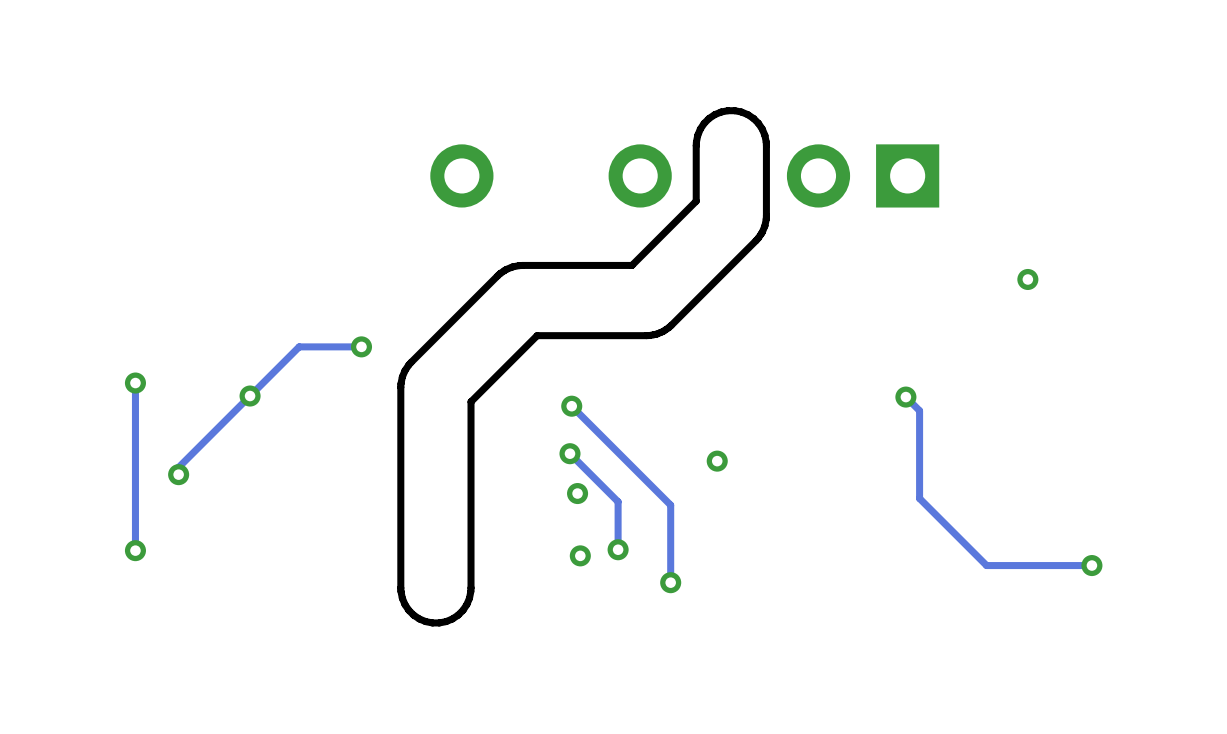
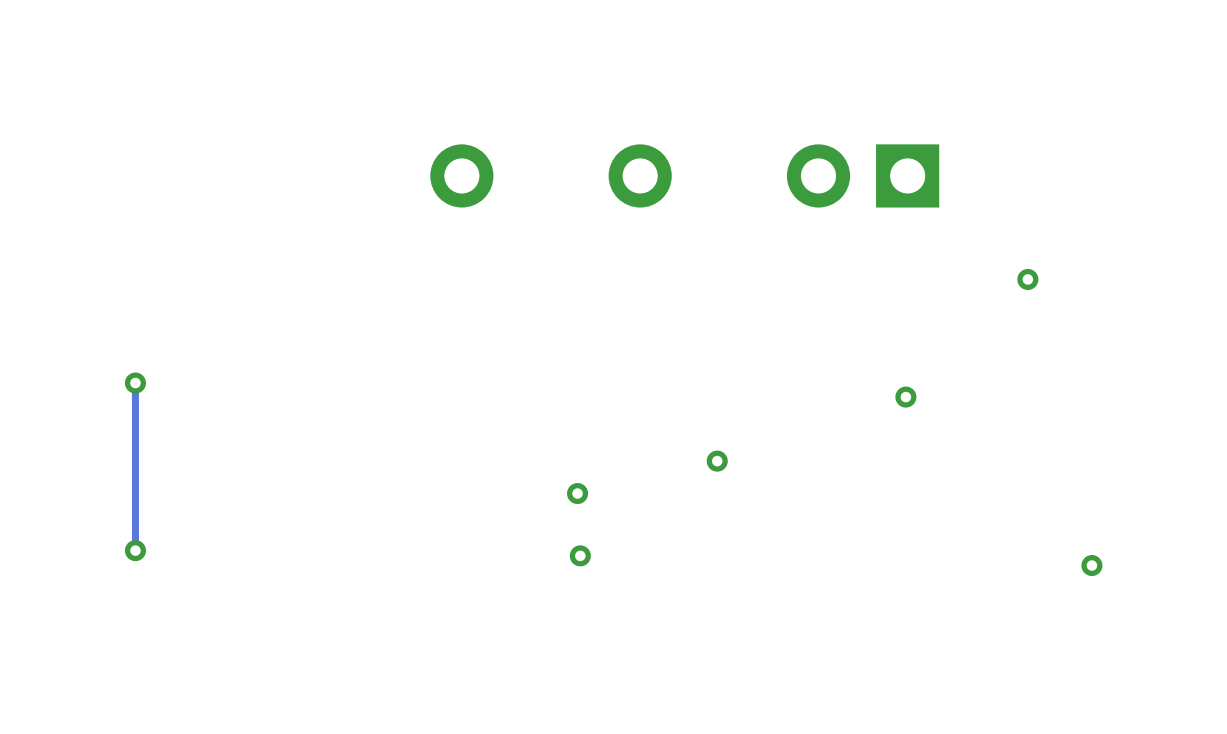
board edge: (734, 110) (753, 118) (764, 135) (766, 215) (762, 232) (671, 325) (663, 331) (646, 335) (537, 335) (471, 401) (469, 598) (458, 615) (446, 621) (432, 622) (419, 618) (404, 604) (400, 591) (400, 387) (404, 370) (497, 275) (506, 269) (522, 265) (631, 265) (696, 201) (696, 142) (700, 129) (714, 114) (734, 110) -> none
track: (361, 346) (299, 346) (178, 467) (178, 474) -> none
via: (361, 346) -> none
via: (250, 396) -> none
track: (905, 397) (919, 410) (919, 498) (986, 565) (1091, 565) -> none
track: (571, 406) (670, 505) (670, 582) -> none
via: (571, 406) -> none
track: (569, 453) (618, 501) (618, 549) -> none
via: (569, 453) -> none
via: (178, 474) -> none
via: (618, 549) -> none
via: (670, 582) -> none

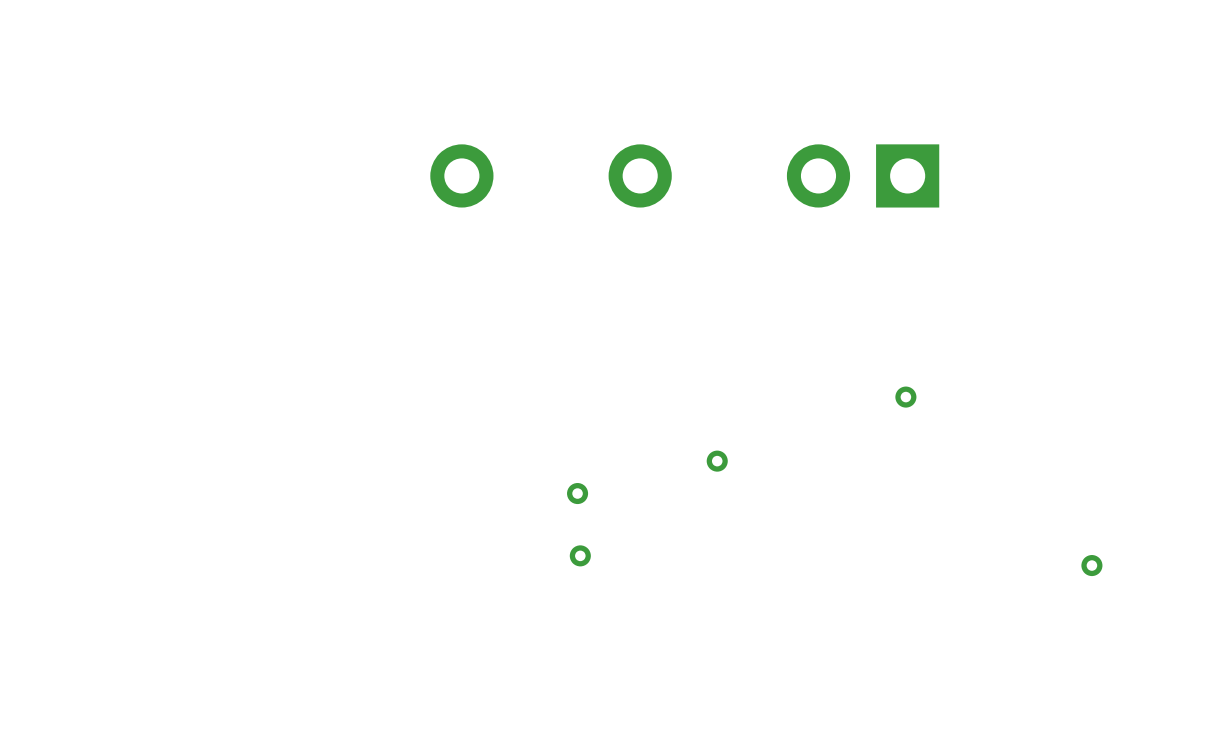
via: (1027, 279) -> none
track: (135, 383) (135, 550) -> none
via: (135, 383) -> none
via: (135, 550) -> none

